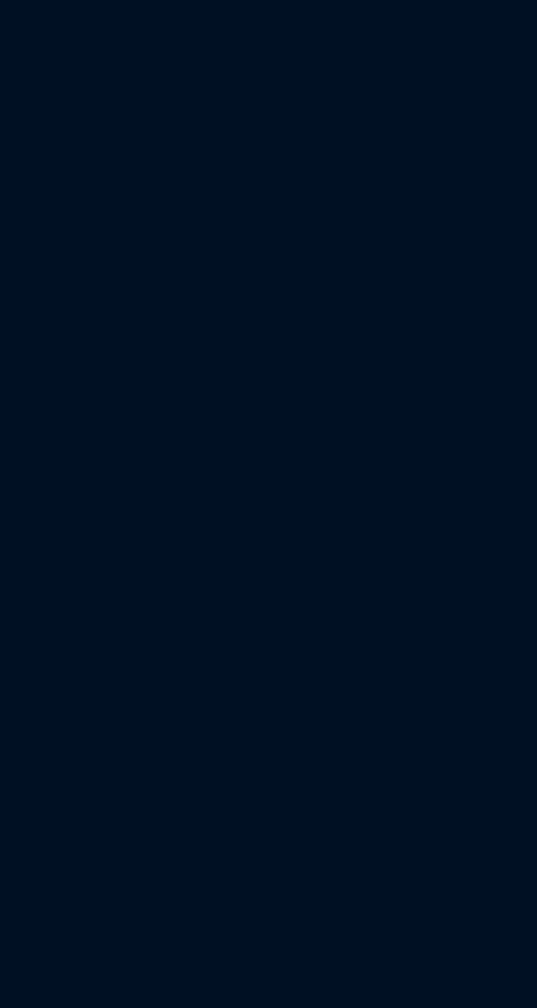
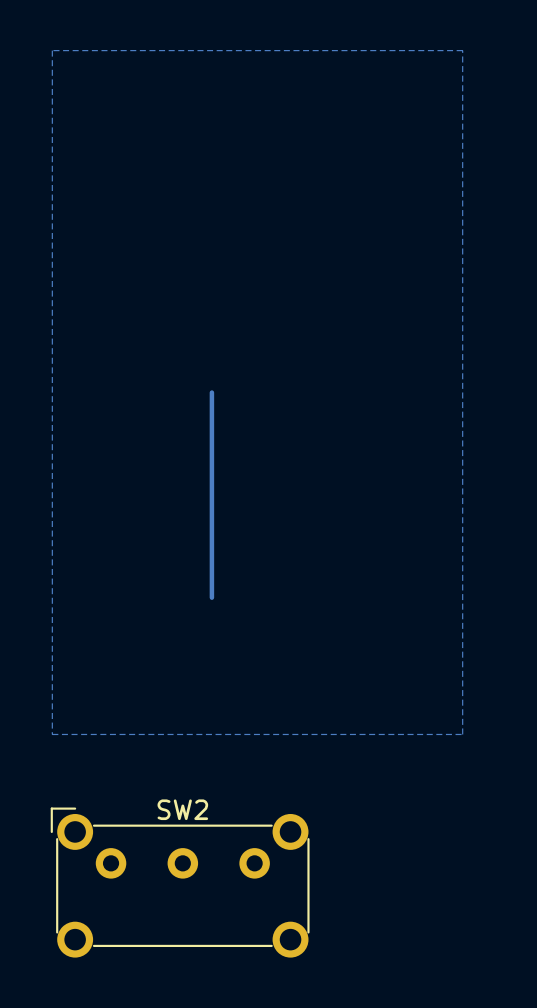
bottom zone outline: none -> (52, 50) (52, 734) (462, 734) (462, 50) (52, 50)
bottom track: none -> (211, 392) (211, 597)
SW2: none -> (180, 882)

